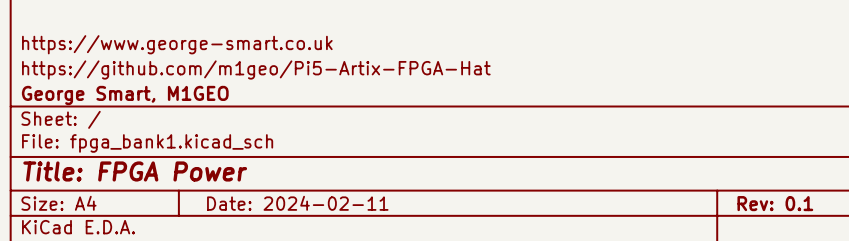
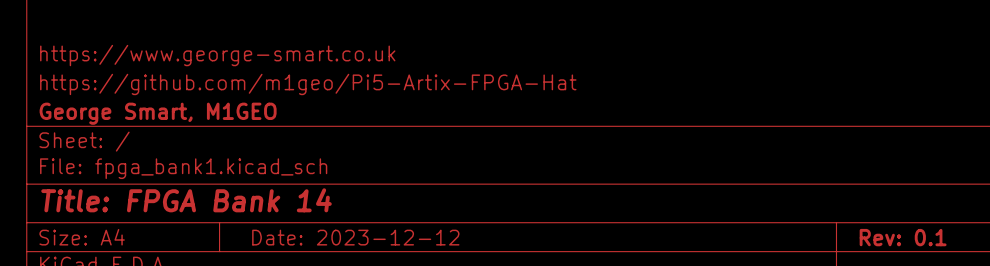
title block: Title: FPGA Power (135, 171) -> Title: FPGA Bank 14 (186, 200)
title block: Date: 2024-02-11 (297, 203) -> Date: 2023-12-12 (355, 237)

